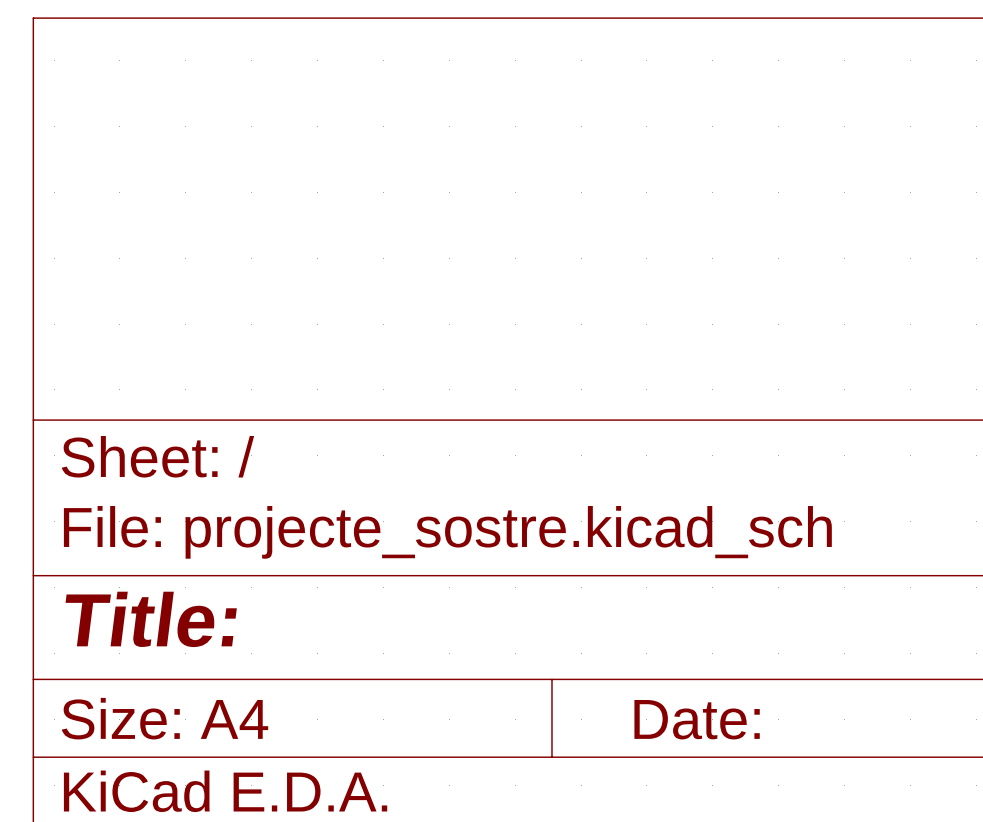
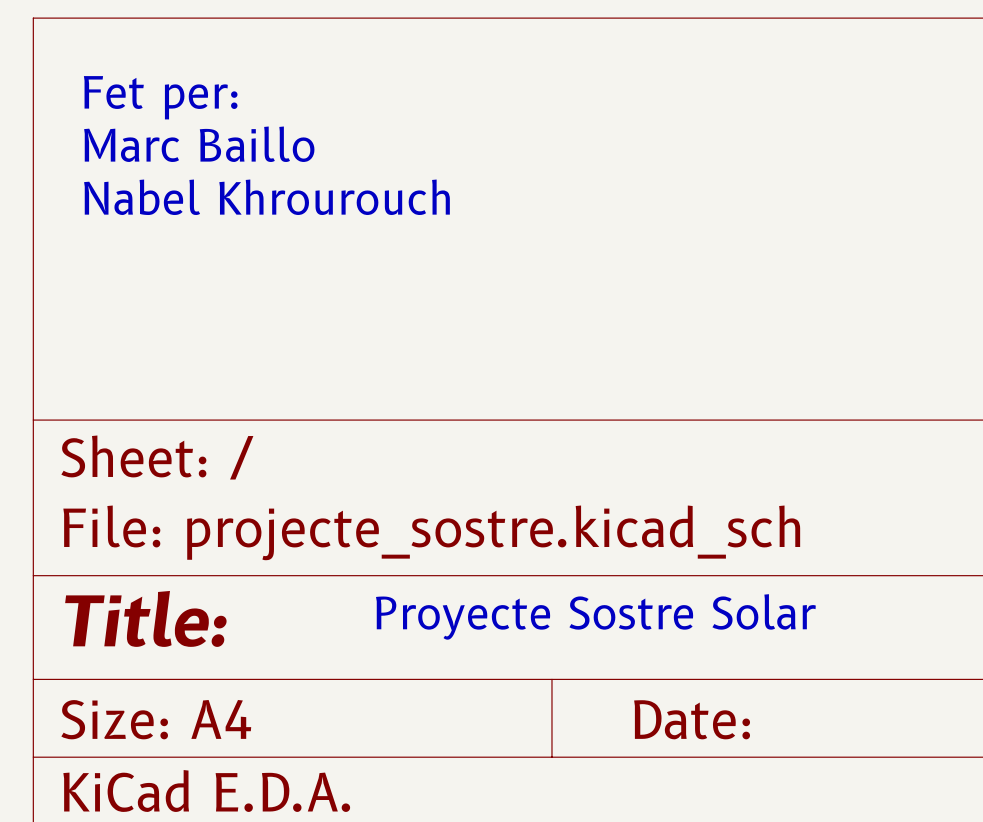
text: none -> Fet per: (160, 97)
text: none -> Marc Baillo (199, 144)
text: none -> Nabel Khrourouch (266, 197)
text: none -> Proyecte Sostre Solar (595, 616)

